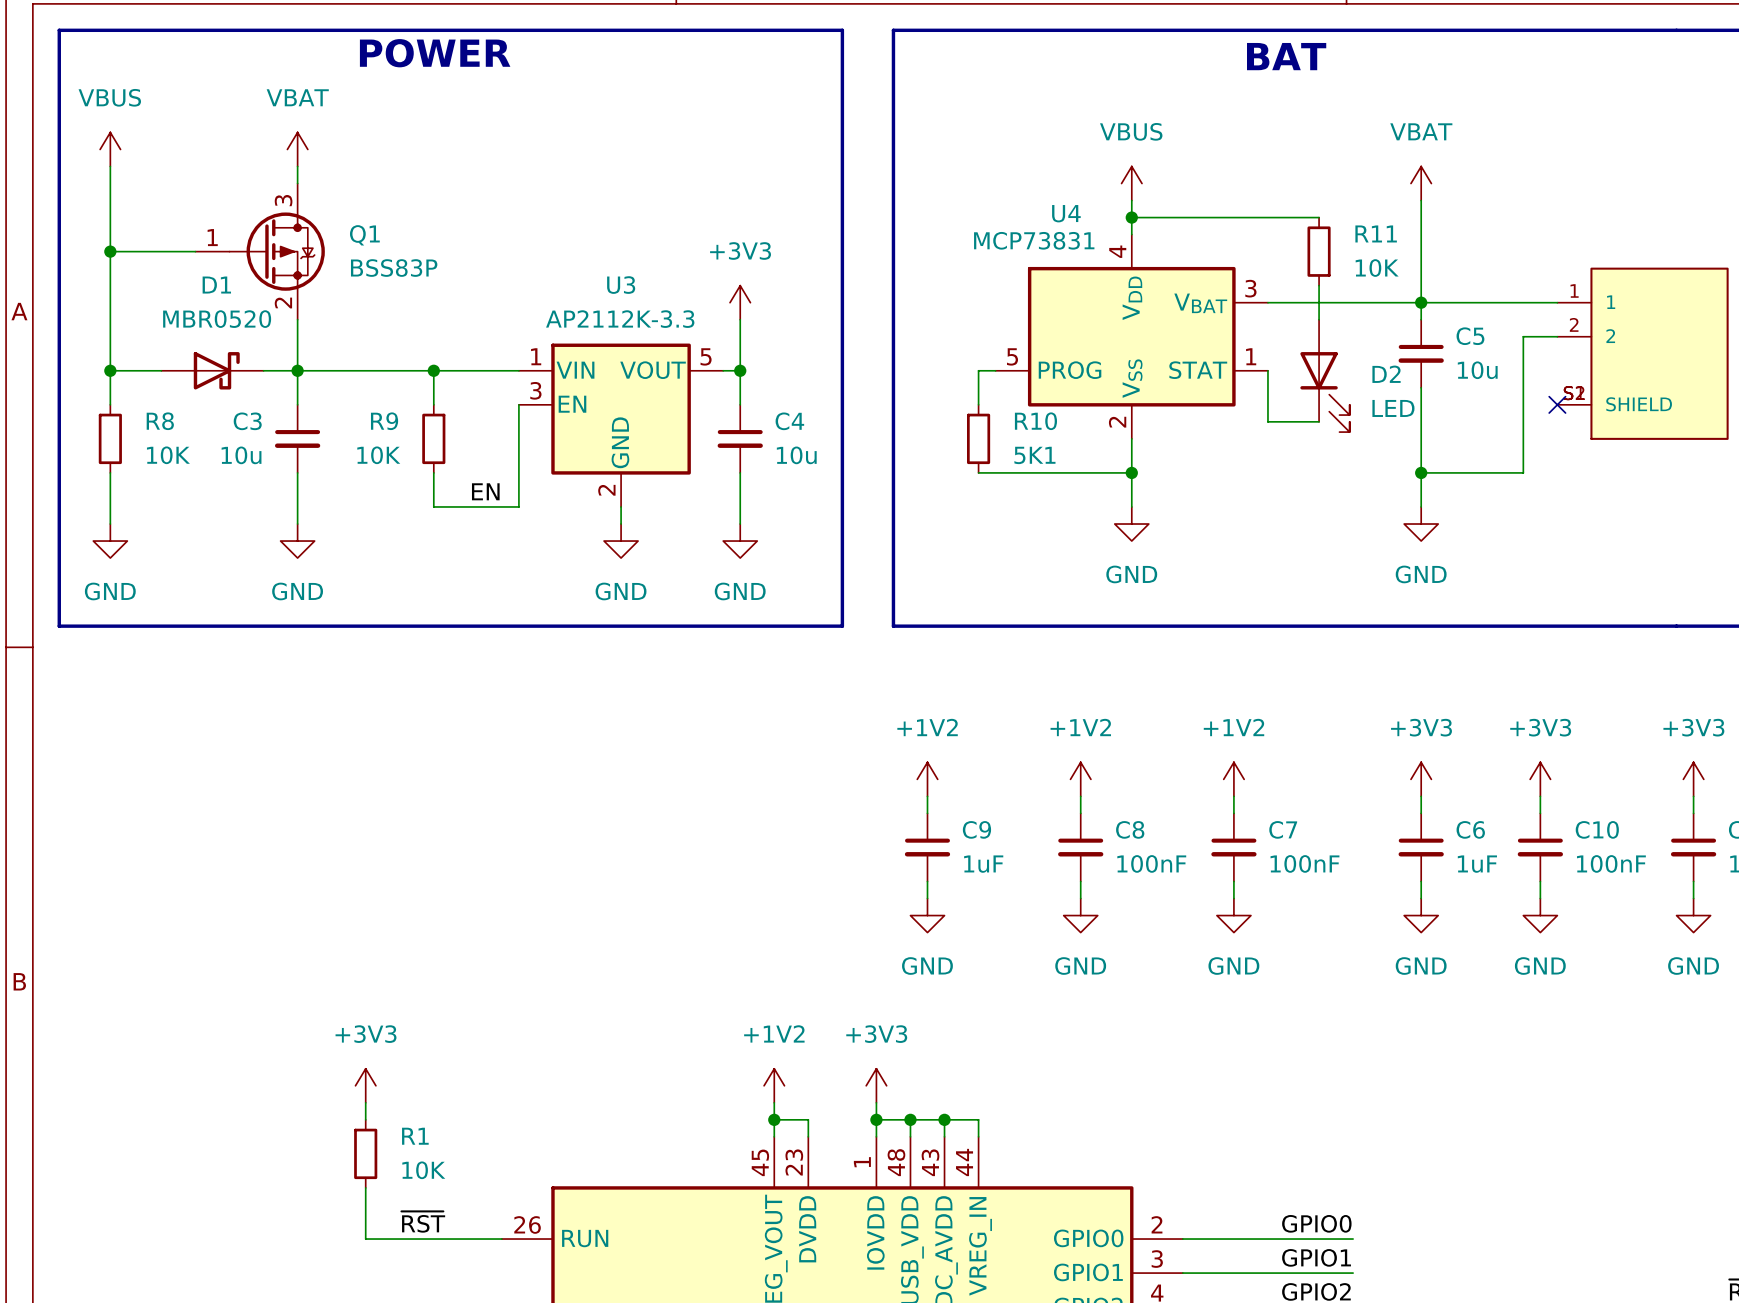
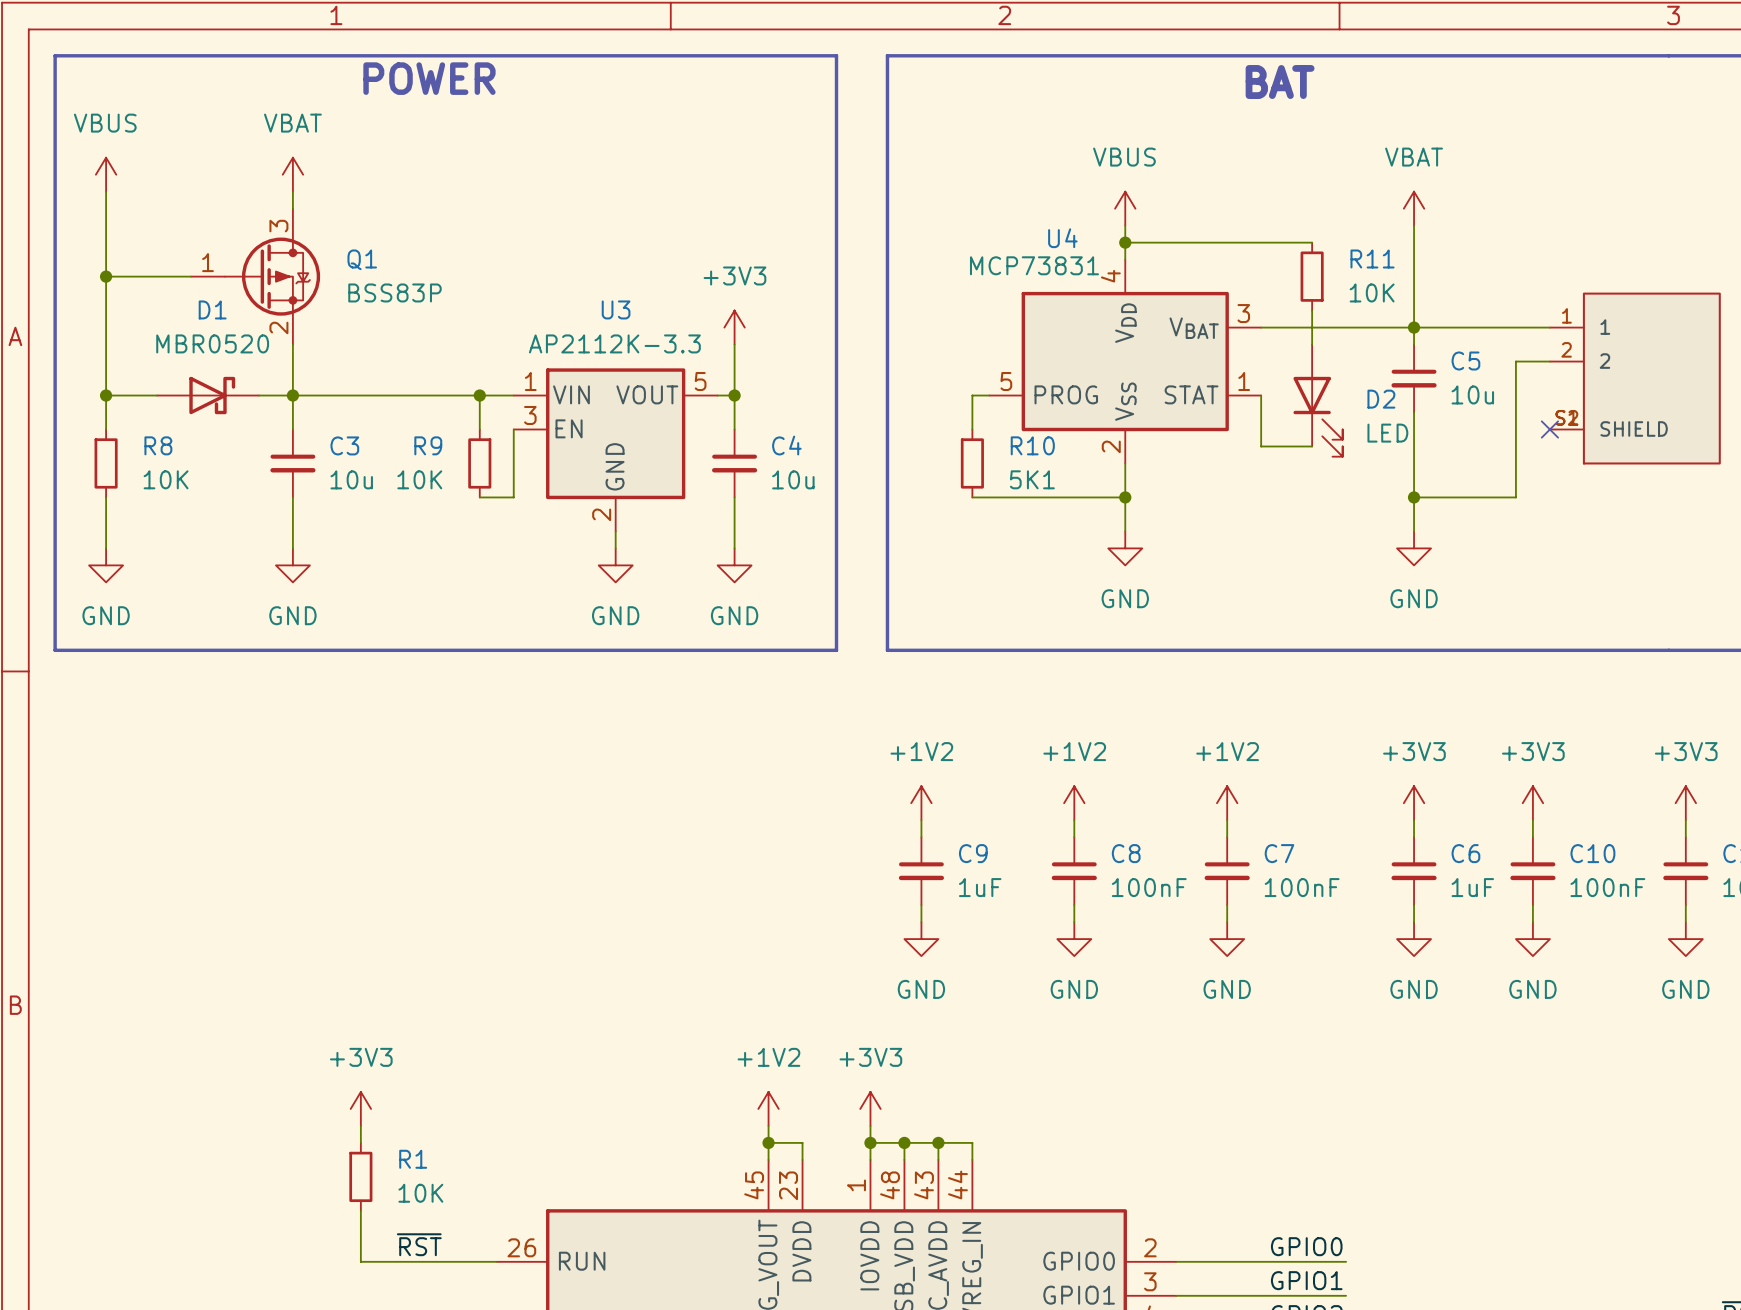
wire: (433, 370) (433, 404) -> (479, 395) (479, 429)
junction position: (433, 370) -> (479, 395)
C3 name position: C3 (247, 421) -> C3 (344, 445)
R9 position: (433, 438) -> (479, 463)
C3 value position: 10u (241, 455) -> 10u (351, 479)
wire: (433, 472) (433, 506) (518, 506) (518, 472) -> (479, 497) (513, 497)
label: EN (485, 491) -> none

